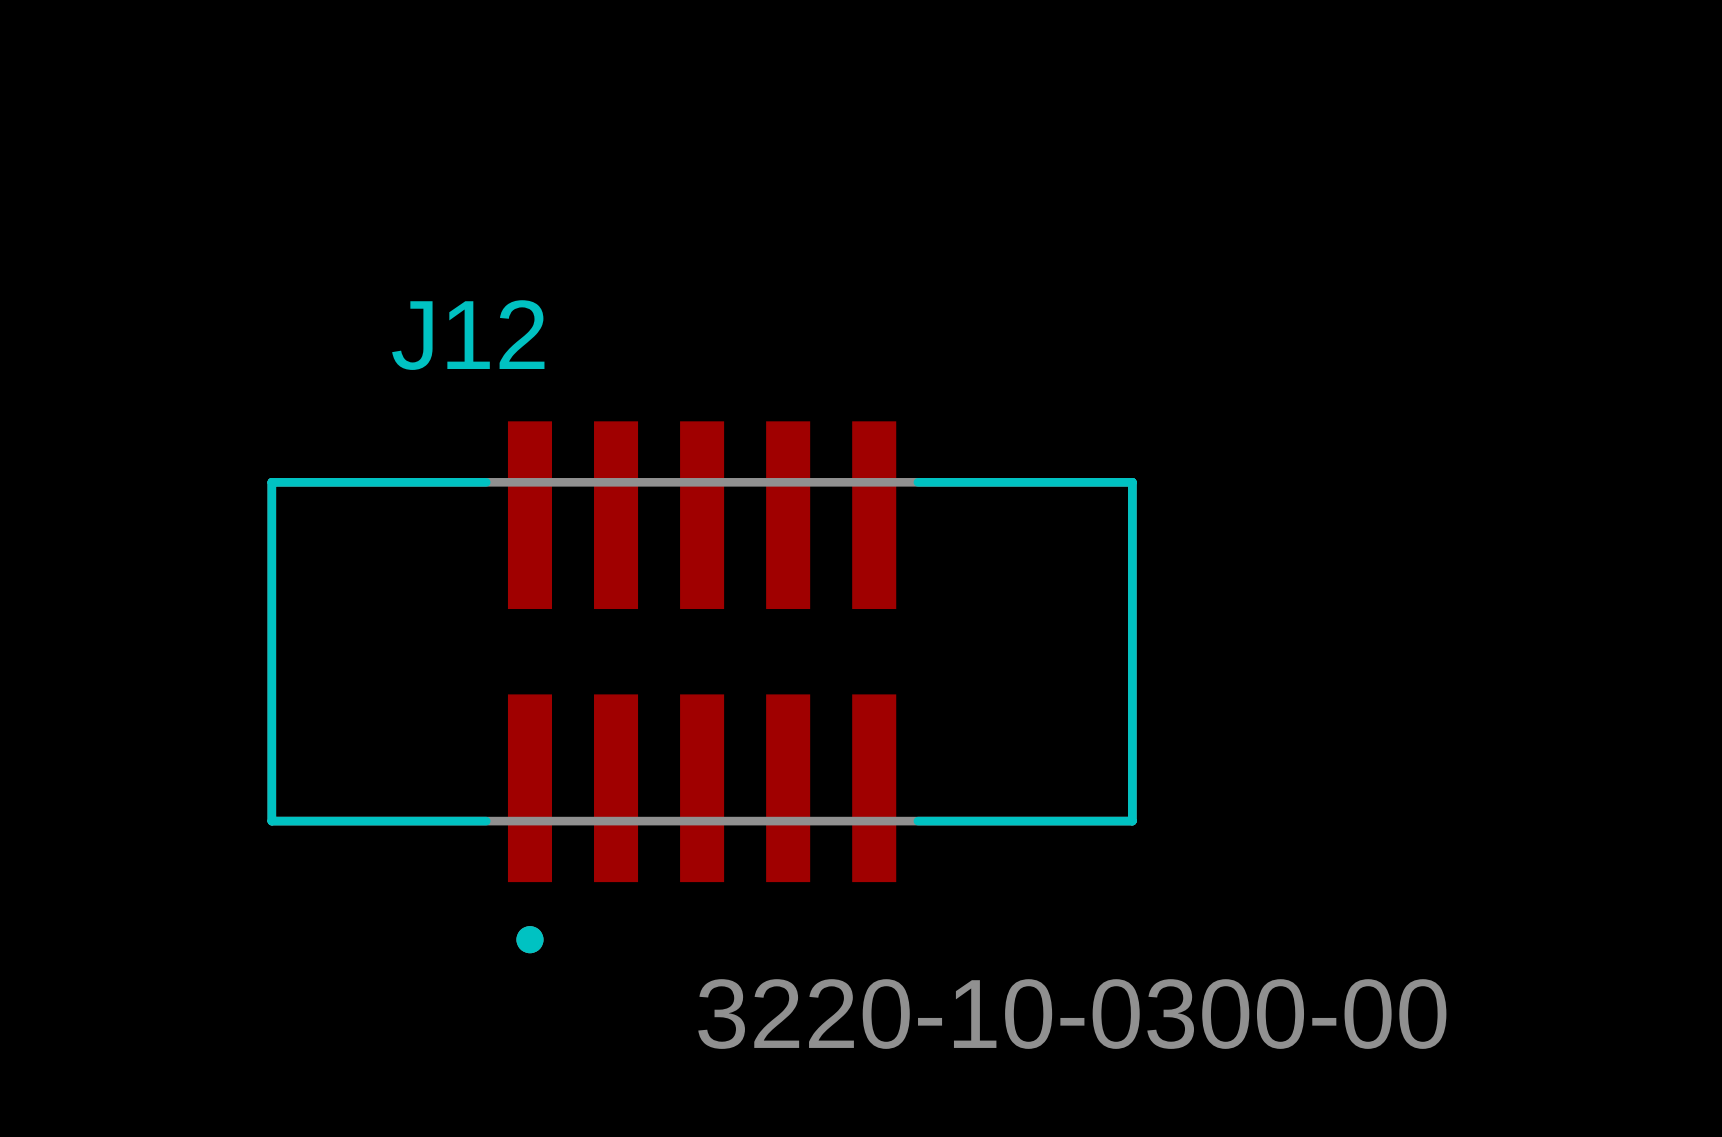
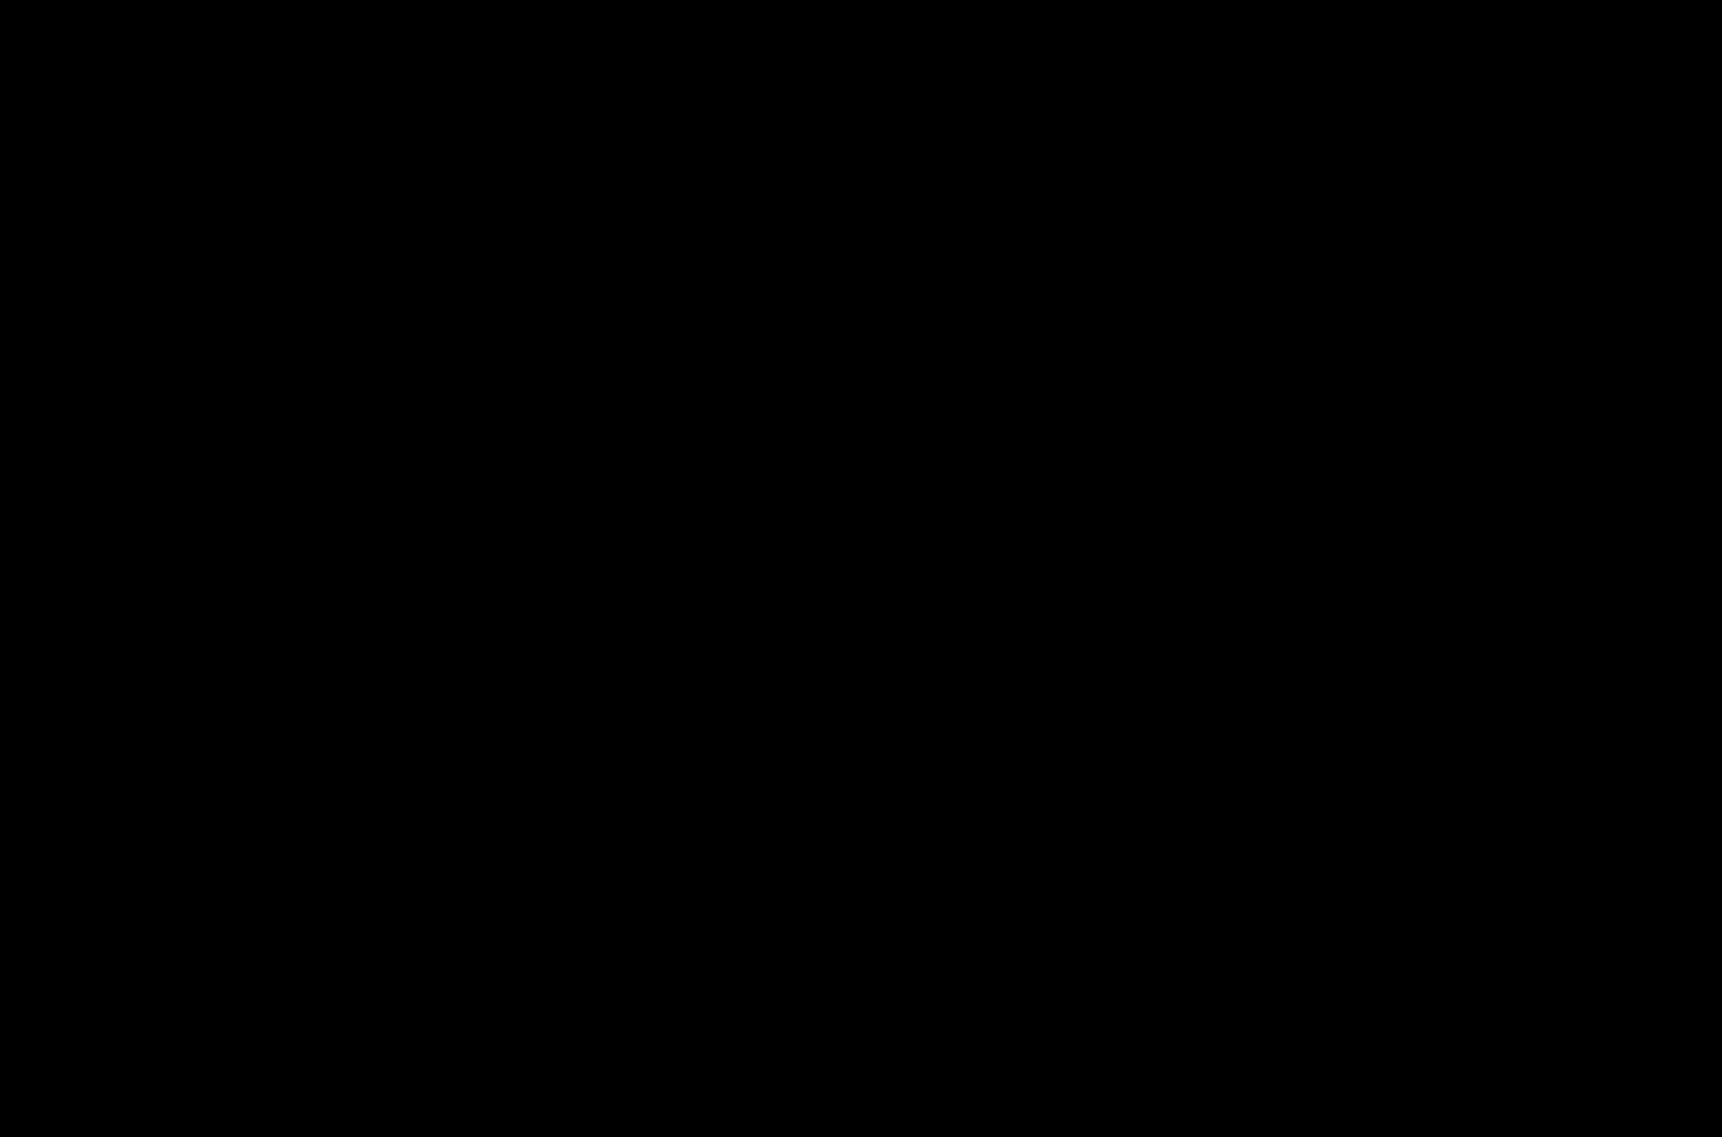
J12: 3220-10-0300-00 (702, 687) -> none

